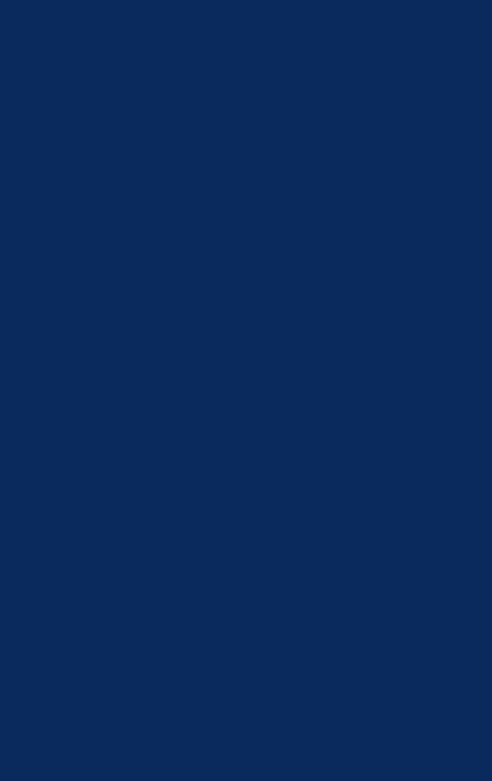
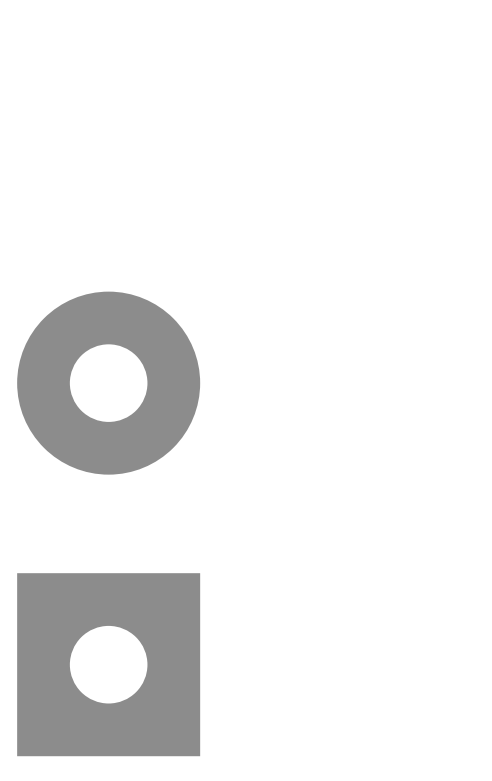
part: none -> (108, 523)

